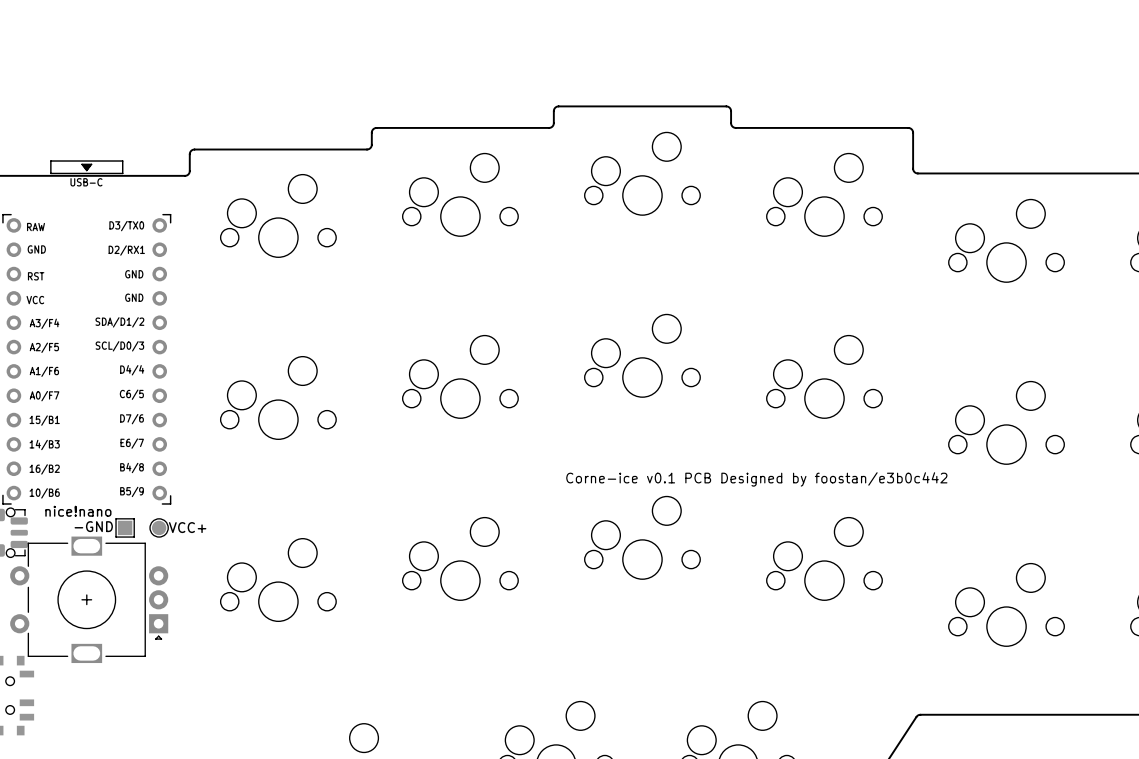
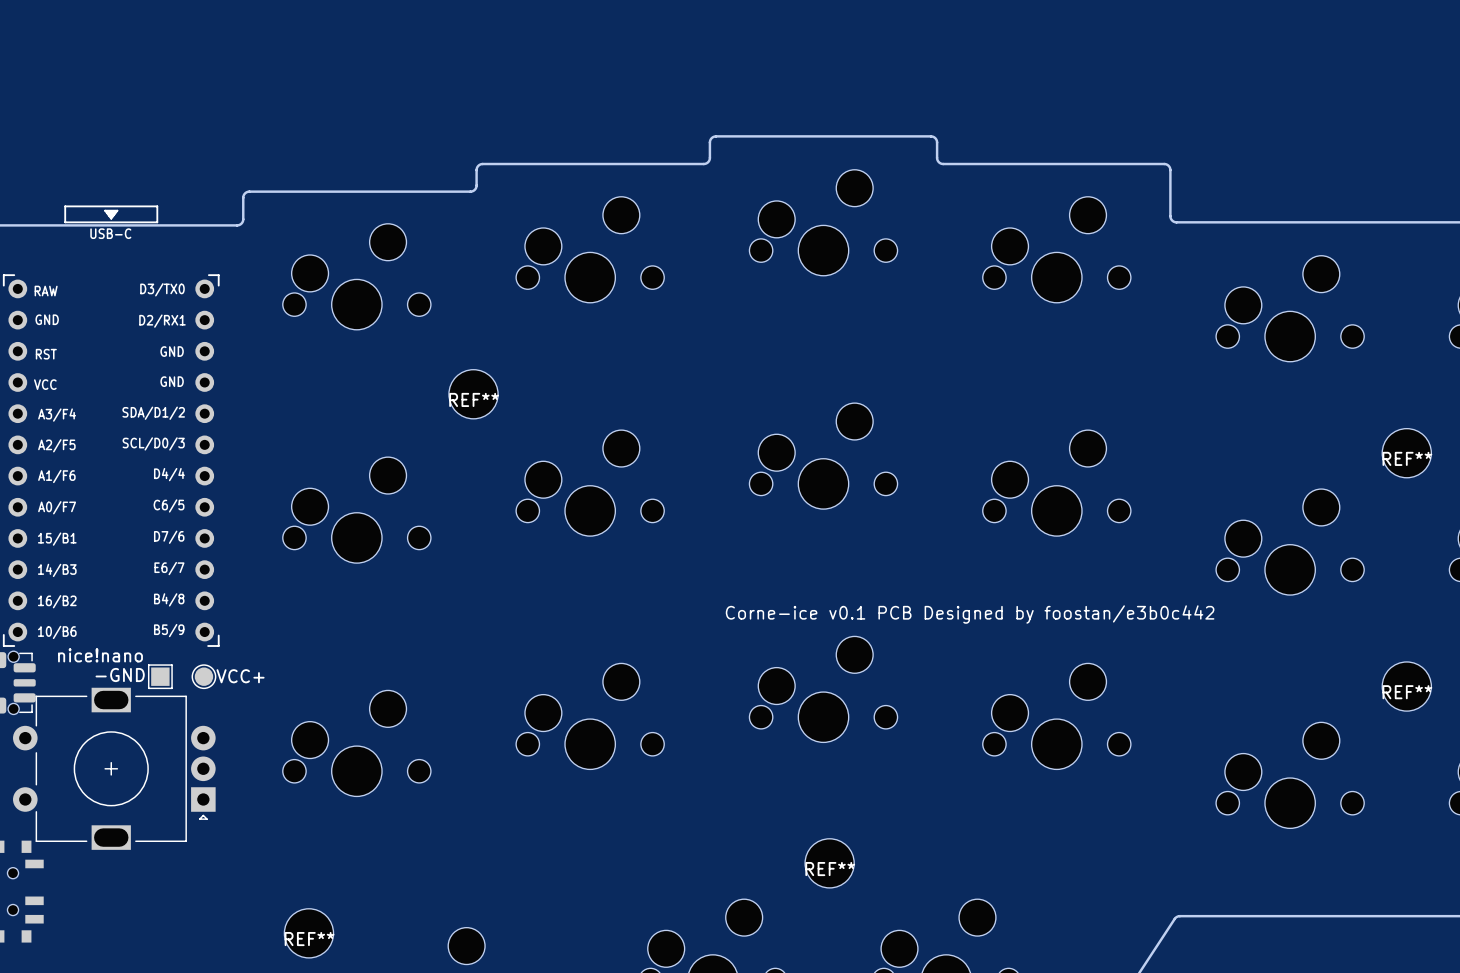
REF**: none -> (473, 394)
REF**: none -> (1406, 453)
REF**: none -> (1406, 686)
REF**: none -> (829, 863)
REF**: none -> (308, 933)

